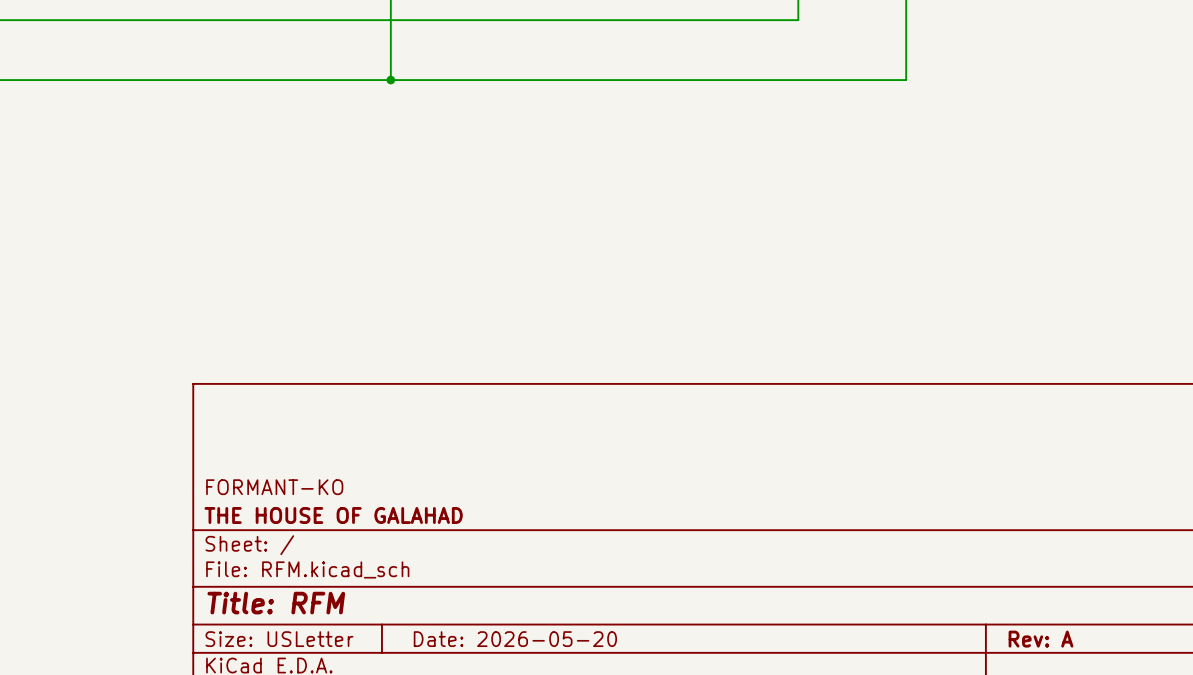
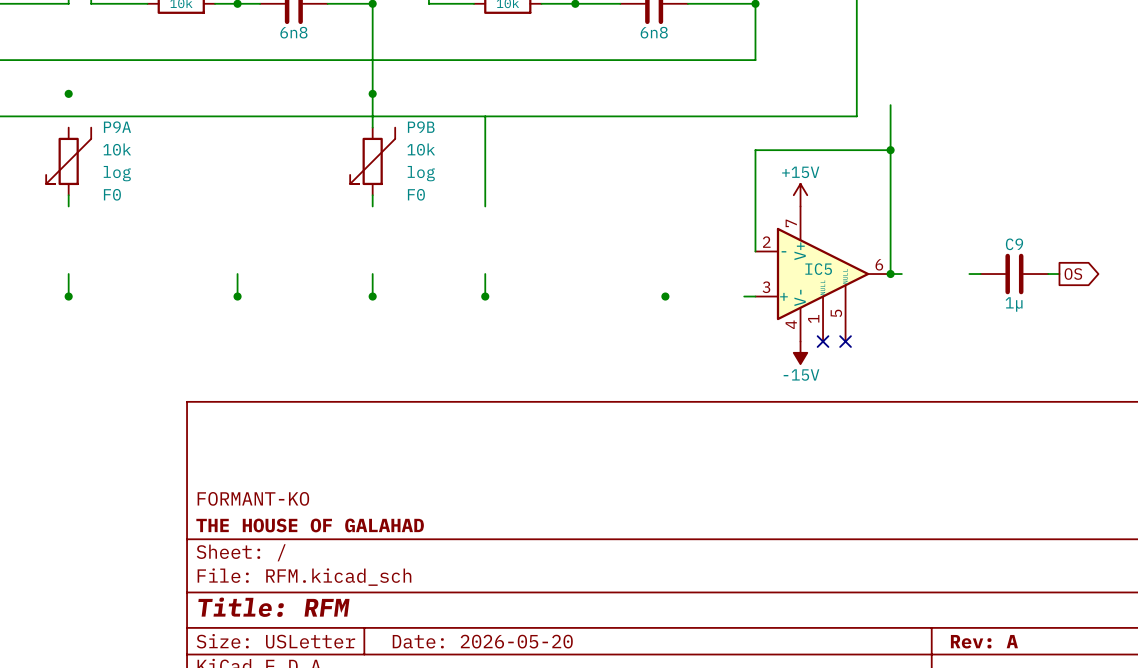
junction: none -> (68, 93)
wire: none -> (890, 105) (890, 274) (901, 274)
wire: none -> (372, 116) (372, 127)
junction position: (390, 80) -> (372, 93)
wire: none -> (485, 116) (485, 206)
wire: none -> (890, 150) (755, 150) (755, 251)
junction: none -> (890, 150)
P9A: none -> 10k (68, 161)
P9B: none -> 10k (372, 161)
wire: none -> (68, 195) (68, 206)
wire: none -> (372, 195) (372, 206)
power symbol: none -> +15V (800, 195)
wire: none -> (68, 274) (68, 296)
wire: none -> (237, 274) (237, 296)
wire: none -> (372, 274) (372, 296)
wire: none -> (485, 274) (485, 296)
IC5: none -> (823, 274)
junction: none -> (890, 274)
wire: none -> (969, 274) (980, 274)
C9: none -> 1µ (1014, 274)
wire: none -> (1048, 274) (1059, 274)
global label: none -> OS (1073, 274)
junction: none -> (68, 296)
junction: none -> (237, 296)
junction: none -> (372, 296)
junction: none -> (485, 296)
junction: none -> (665, 296)
wire: none -> (744, 296) (755, 296)
no-connect mark: none -> (823, 341)
no-connect mark: none -> (845, 341)
power symbol: none -> -15V (800, 352)

